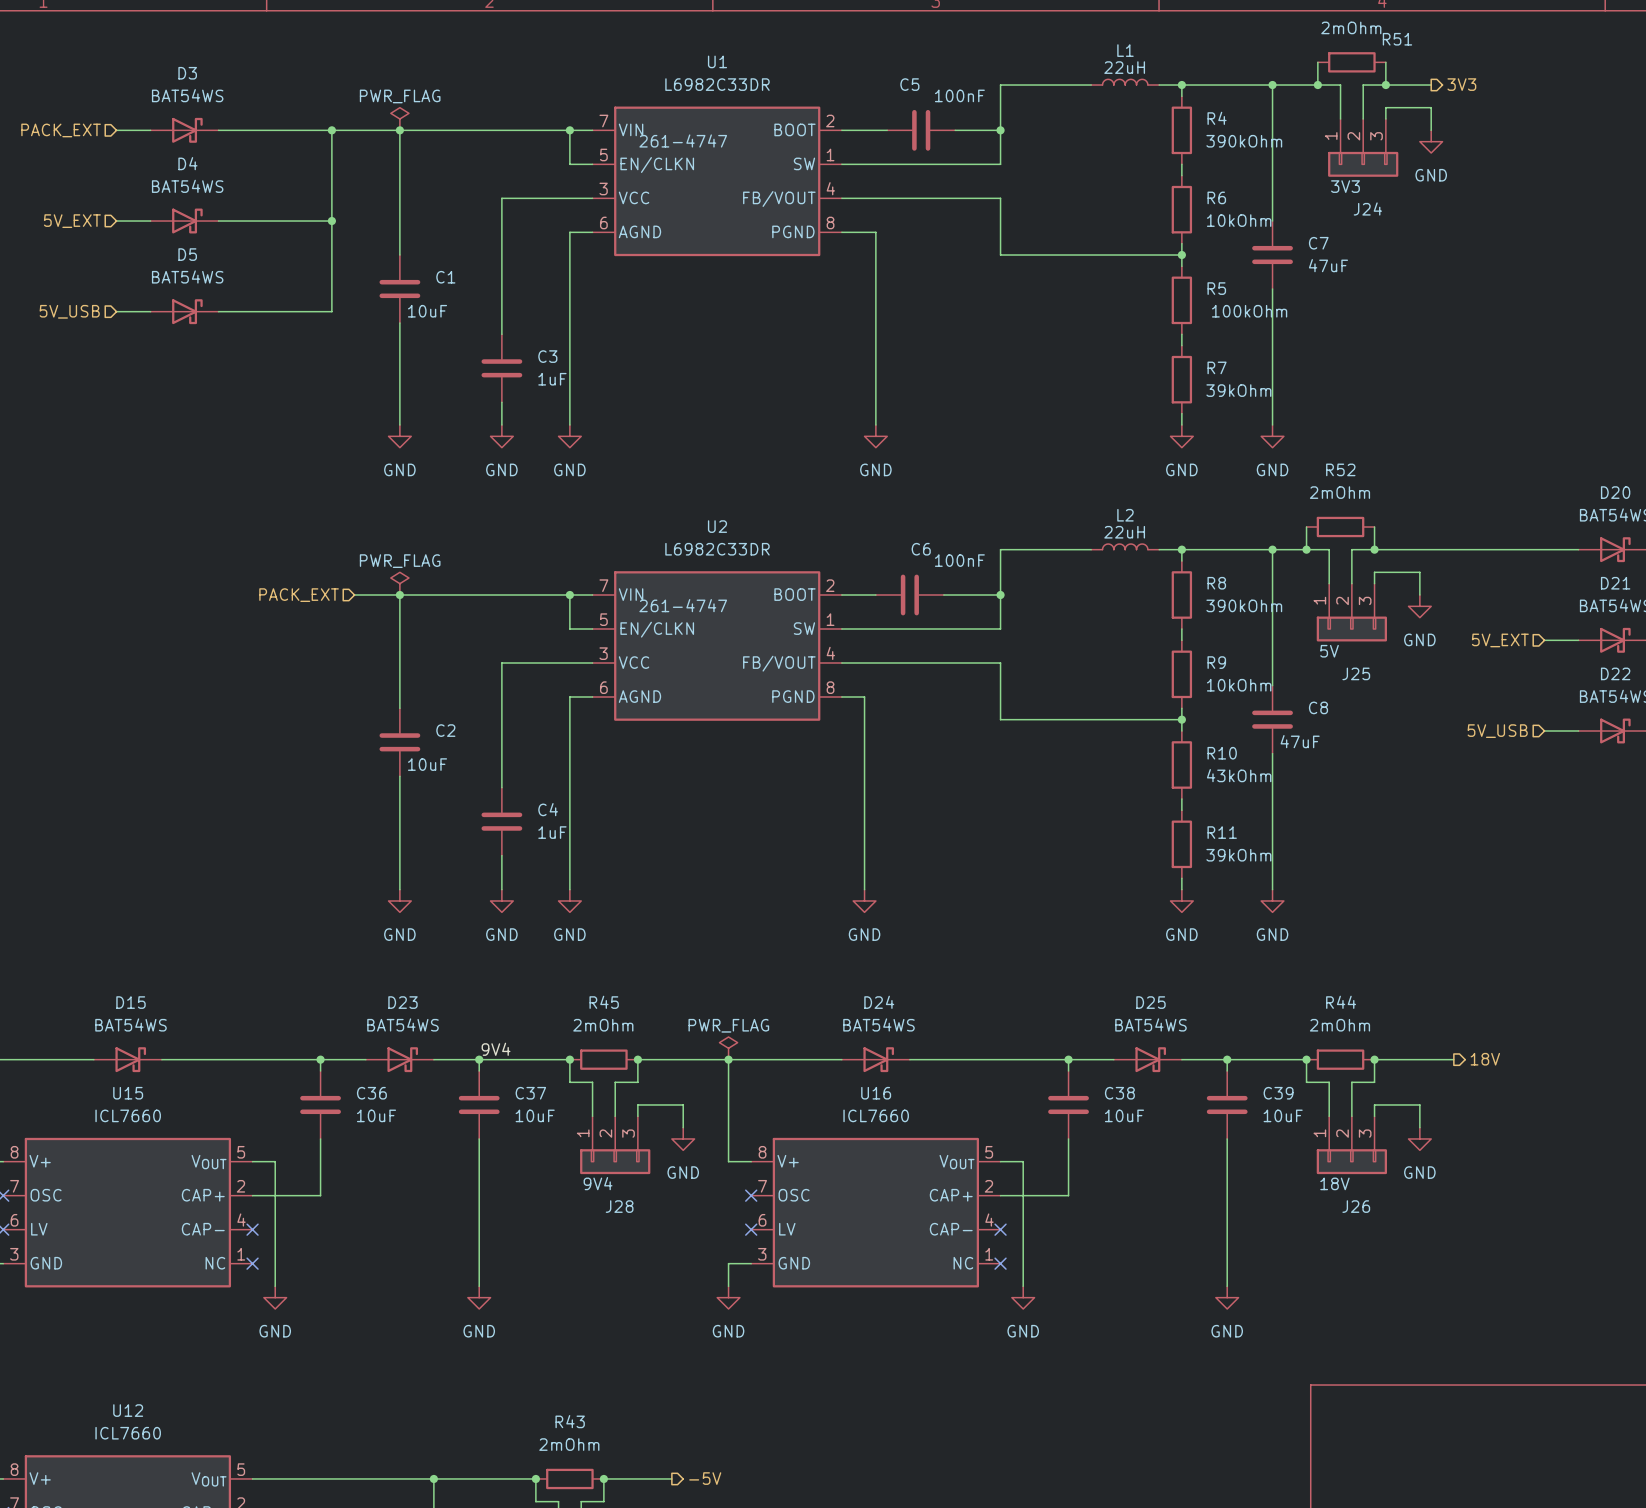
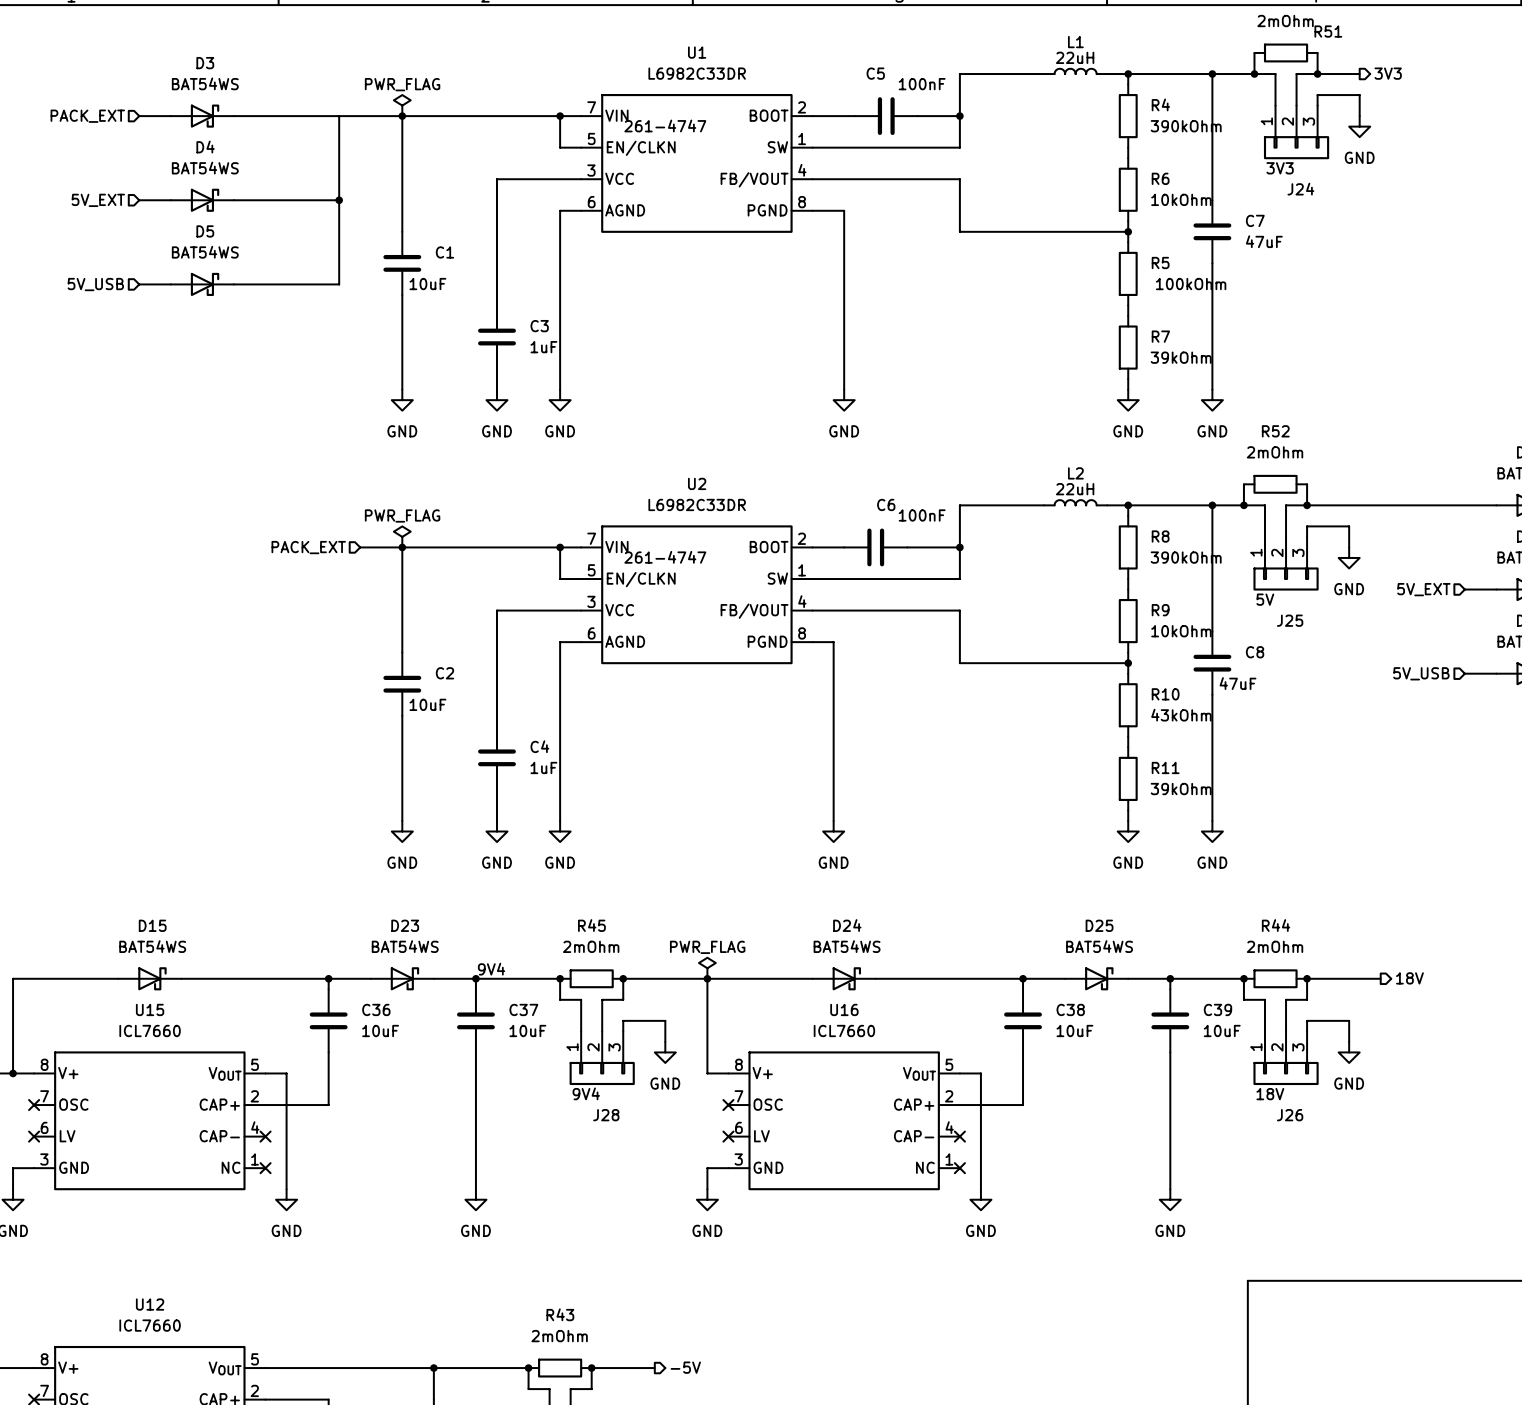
junction: (331, 130) -> none

